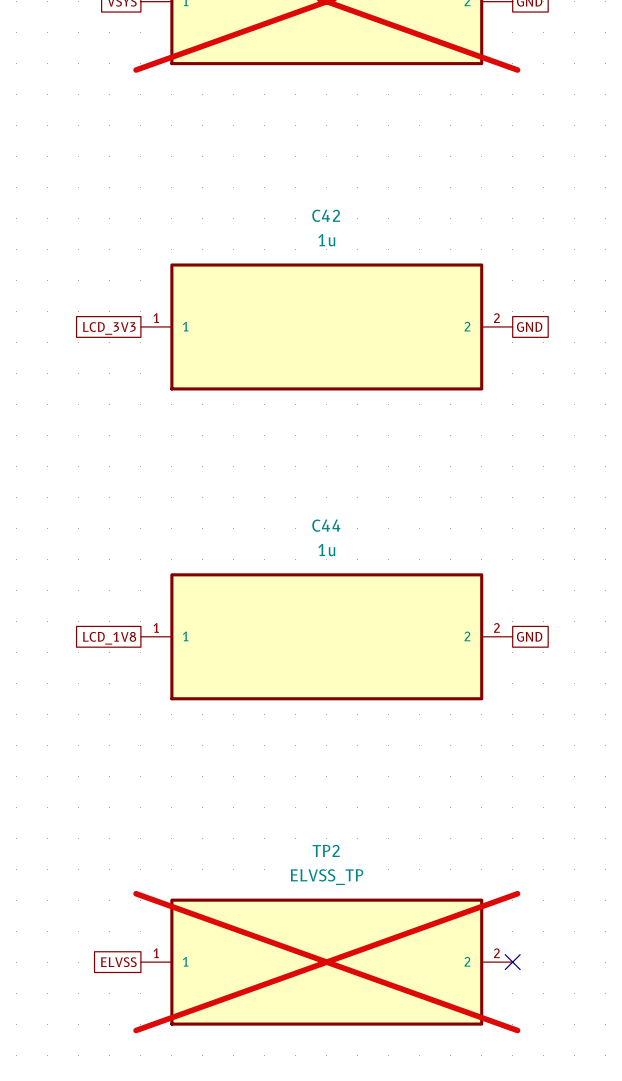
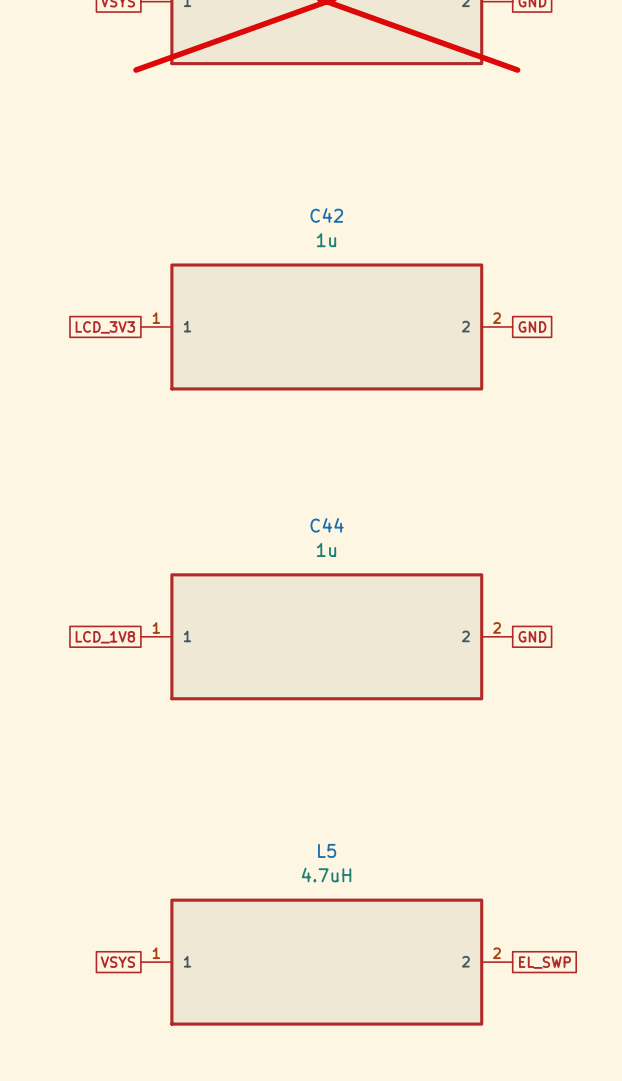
TP2 name: TP2 (326, 850) -> L5 (327, 850)
TP2 value: ELVSS_TP (327, 877) -> 4.7uH (326, 875)
global label: ELVSS (118, 962) -> VSYS (117, 962)
TP2 do-not-place cross: (326, 962) -> none
no-connect mark: (512, 962) -> none
global label: none -> EL_SWP (545, 962)

